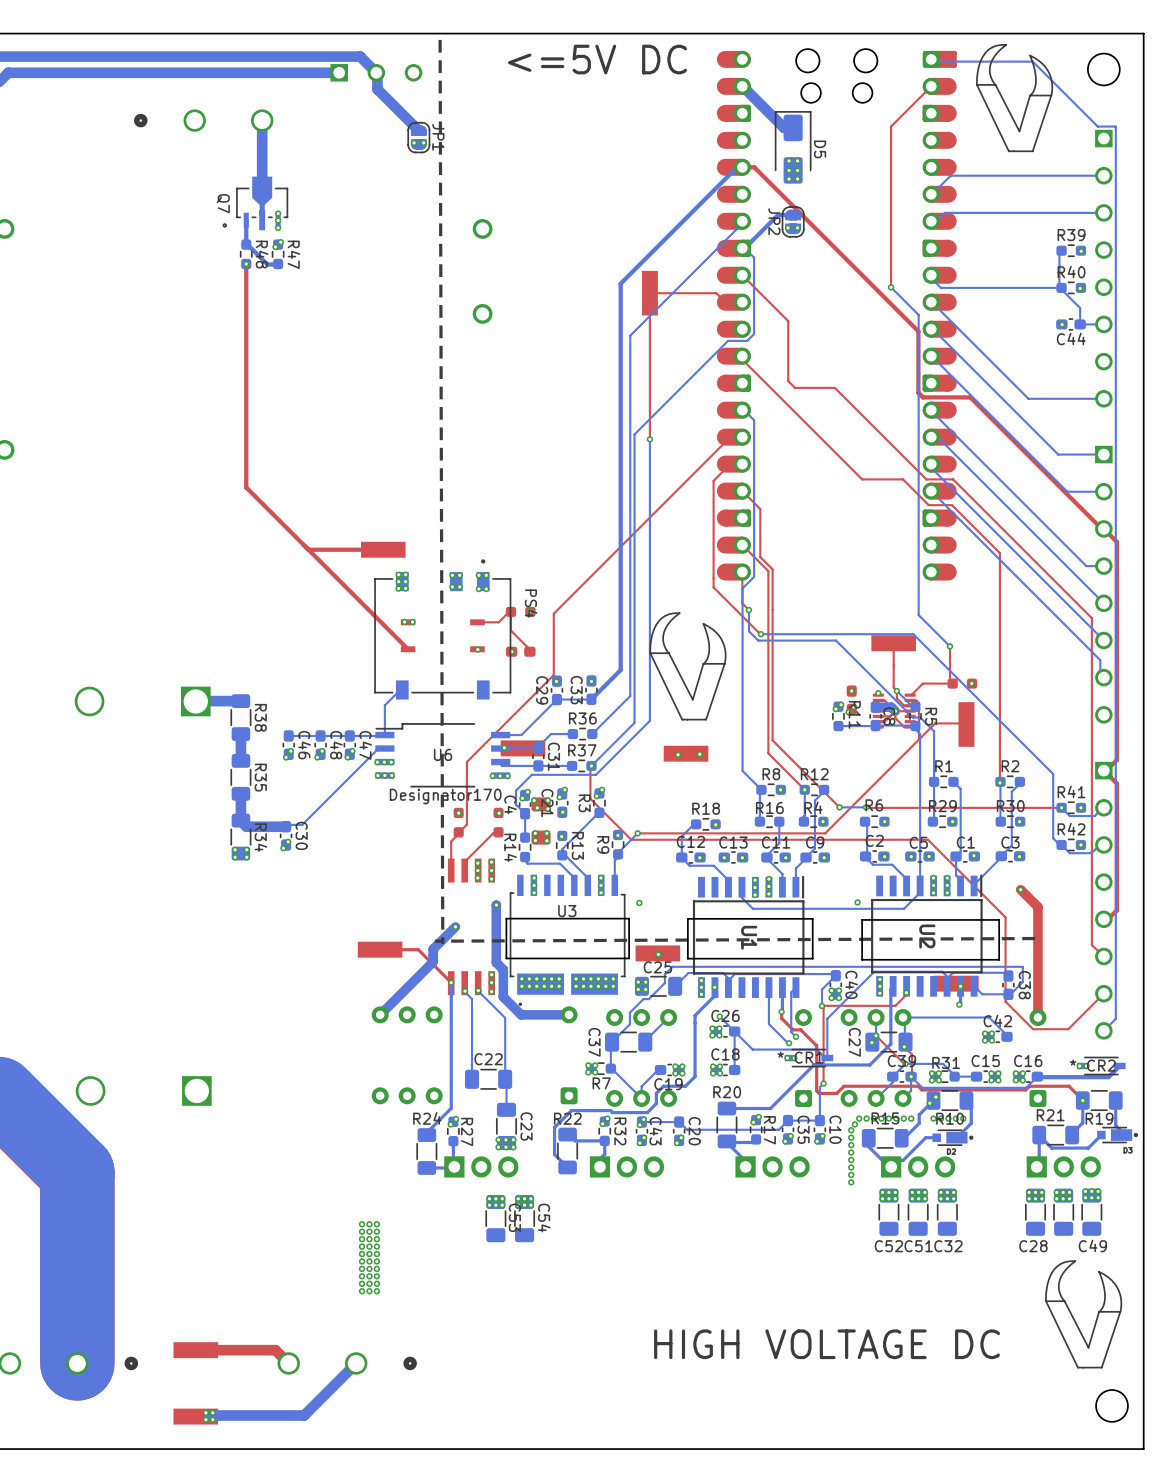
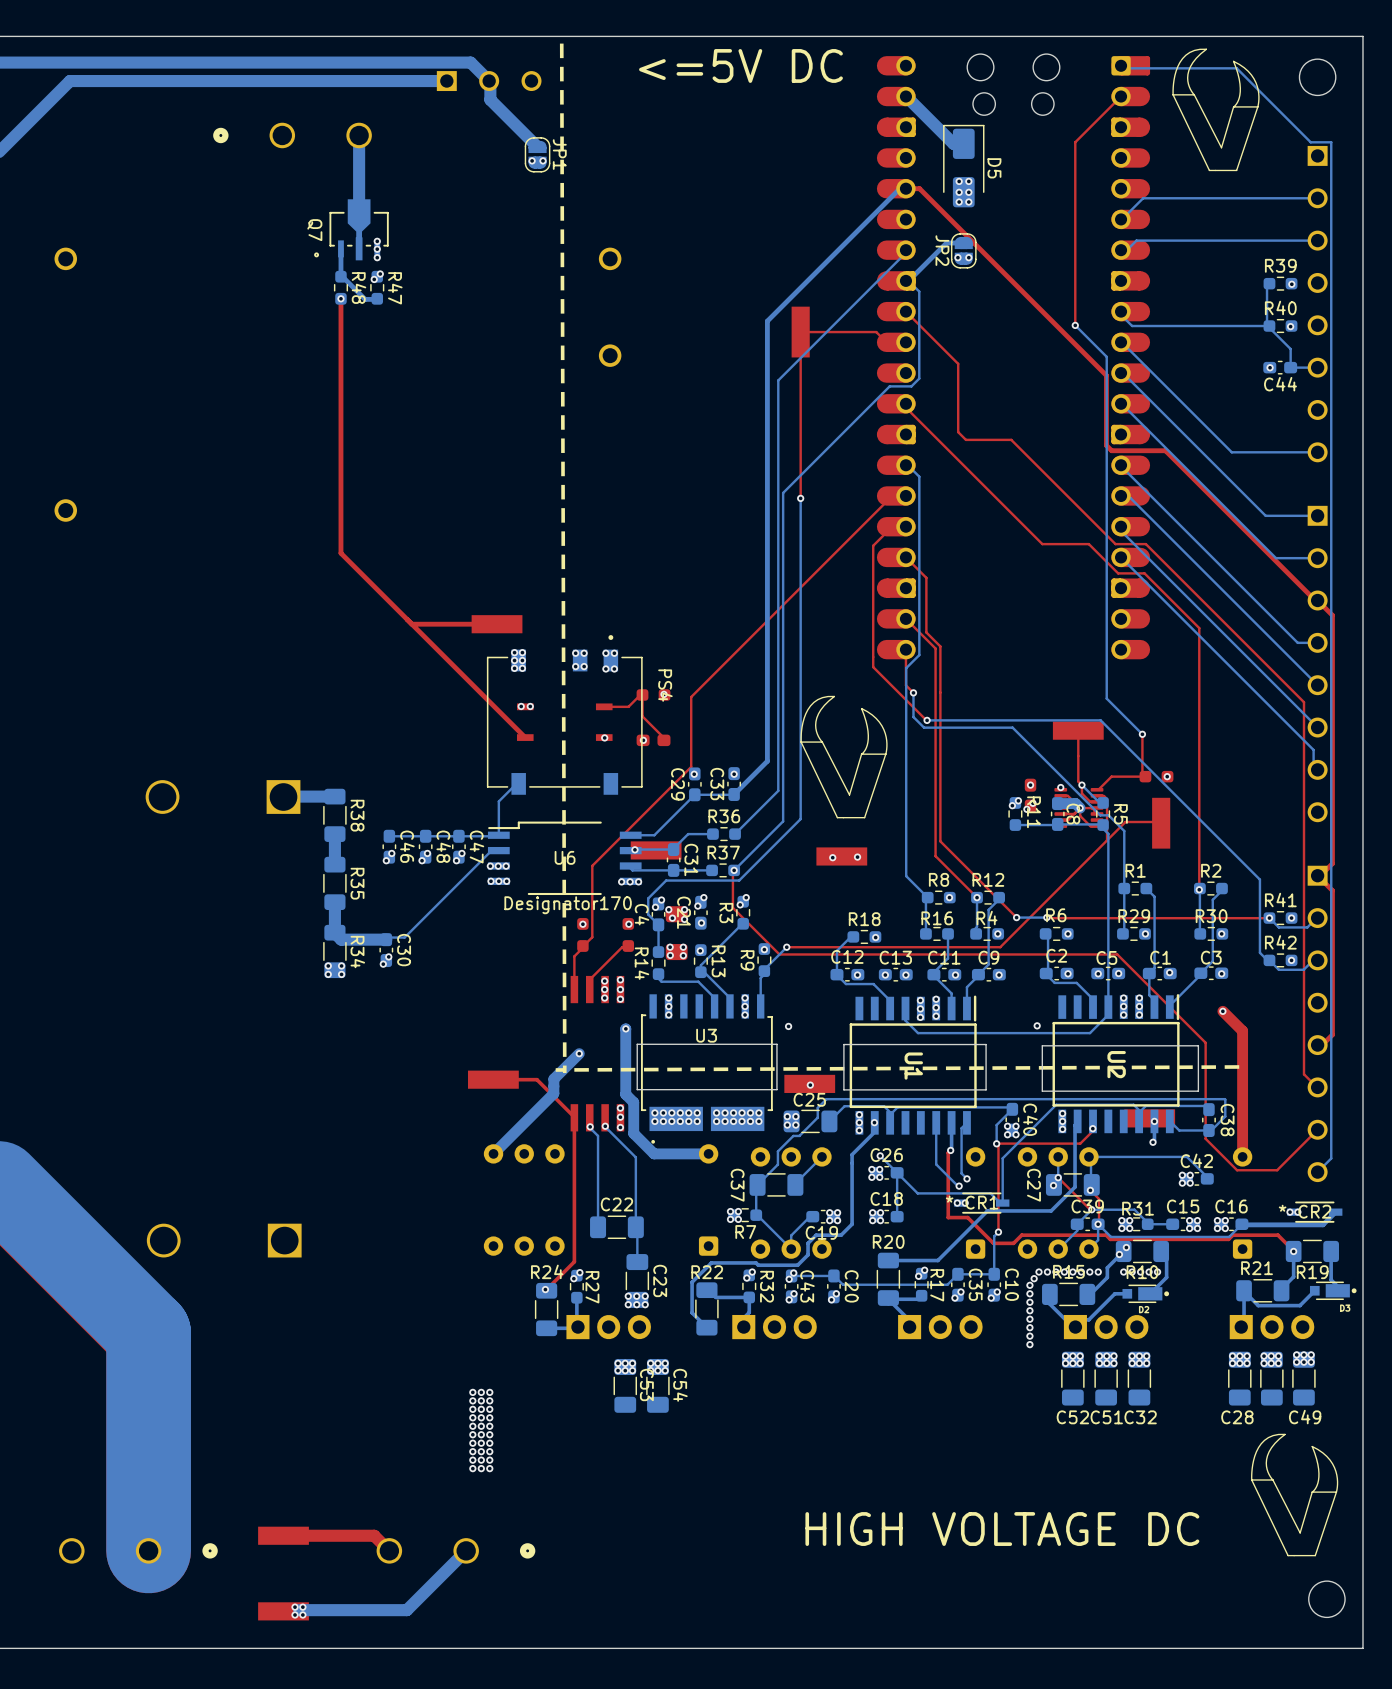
bottom track: (451, 982) (451, 1108) (430, 1129) -> none
via: (451, 982) -> none
top track: none -> (574, 1117) (574, 1261) (546, 1290)
top track: (781, 1011) (781, 1018) (793, 1029) (800, 1029) (816, 1045) (816, 1090) -> (950, 1150) (948, 1152) (948, 1217) (967, 1217) (990, 1240)
via: none -> (545, 1289)

